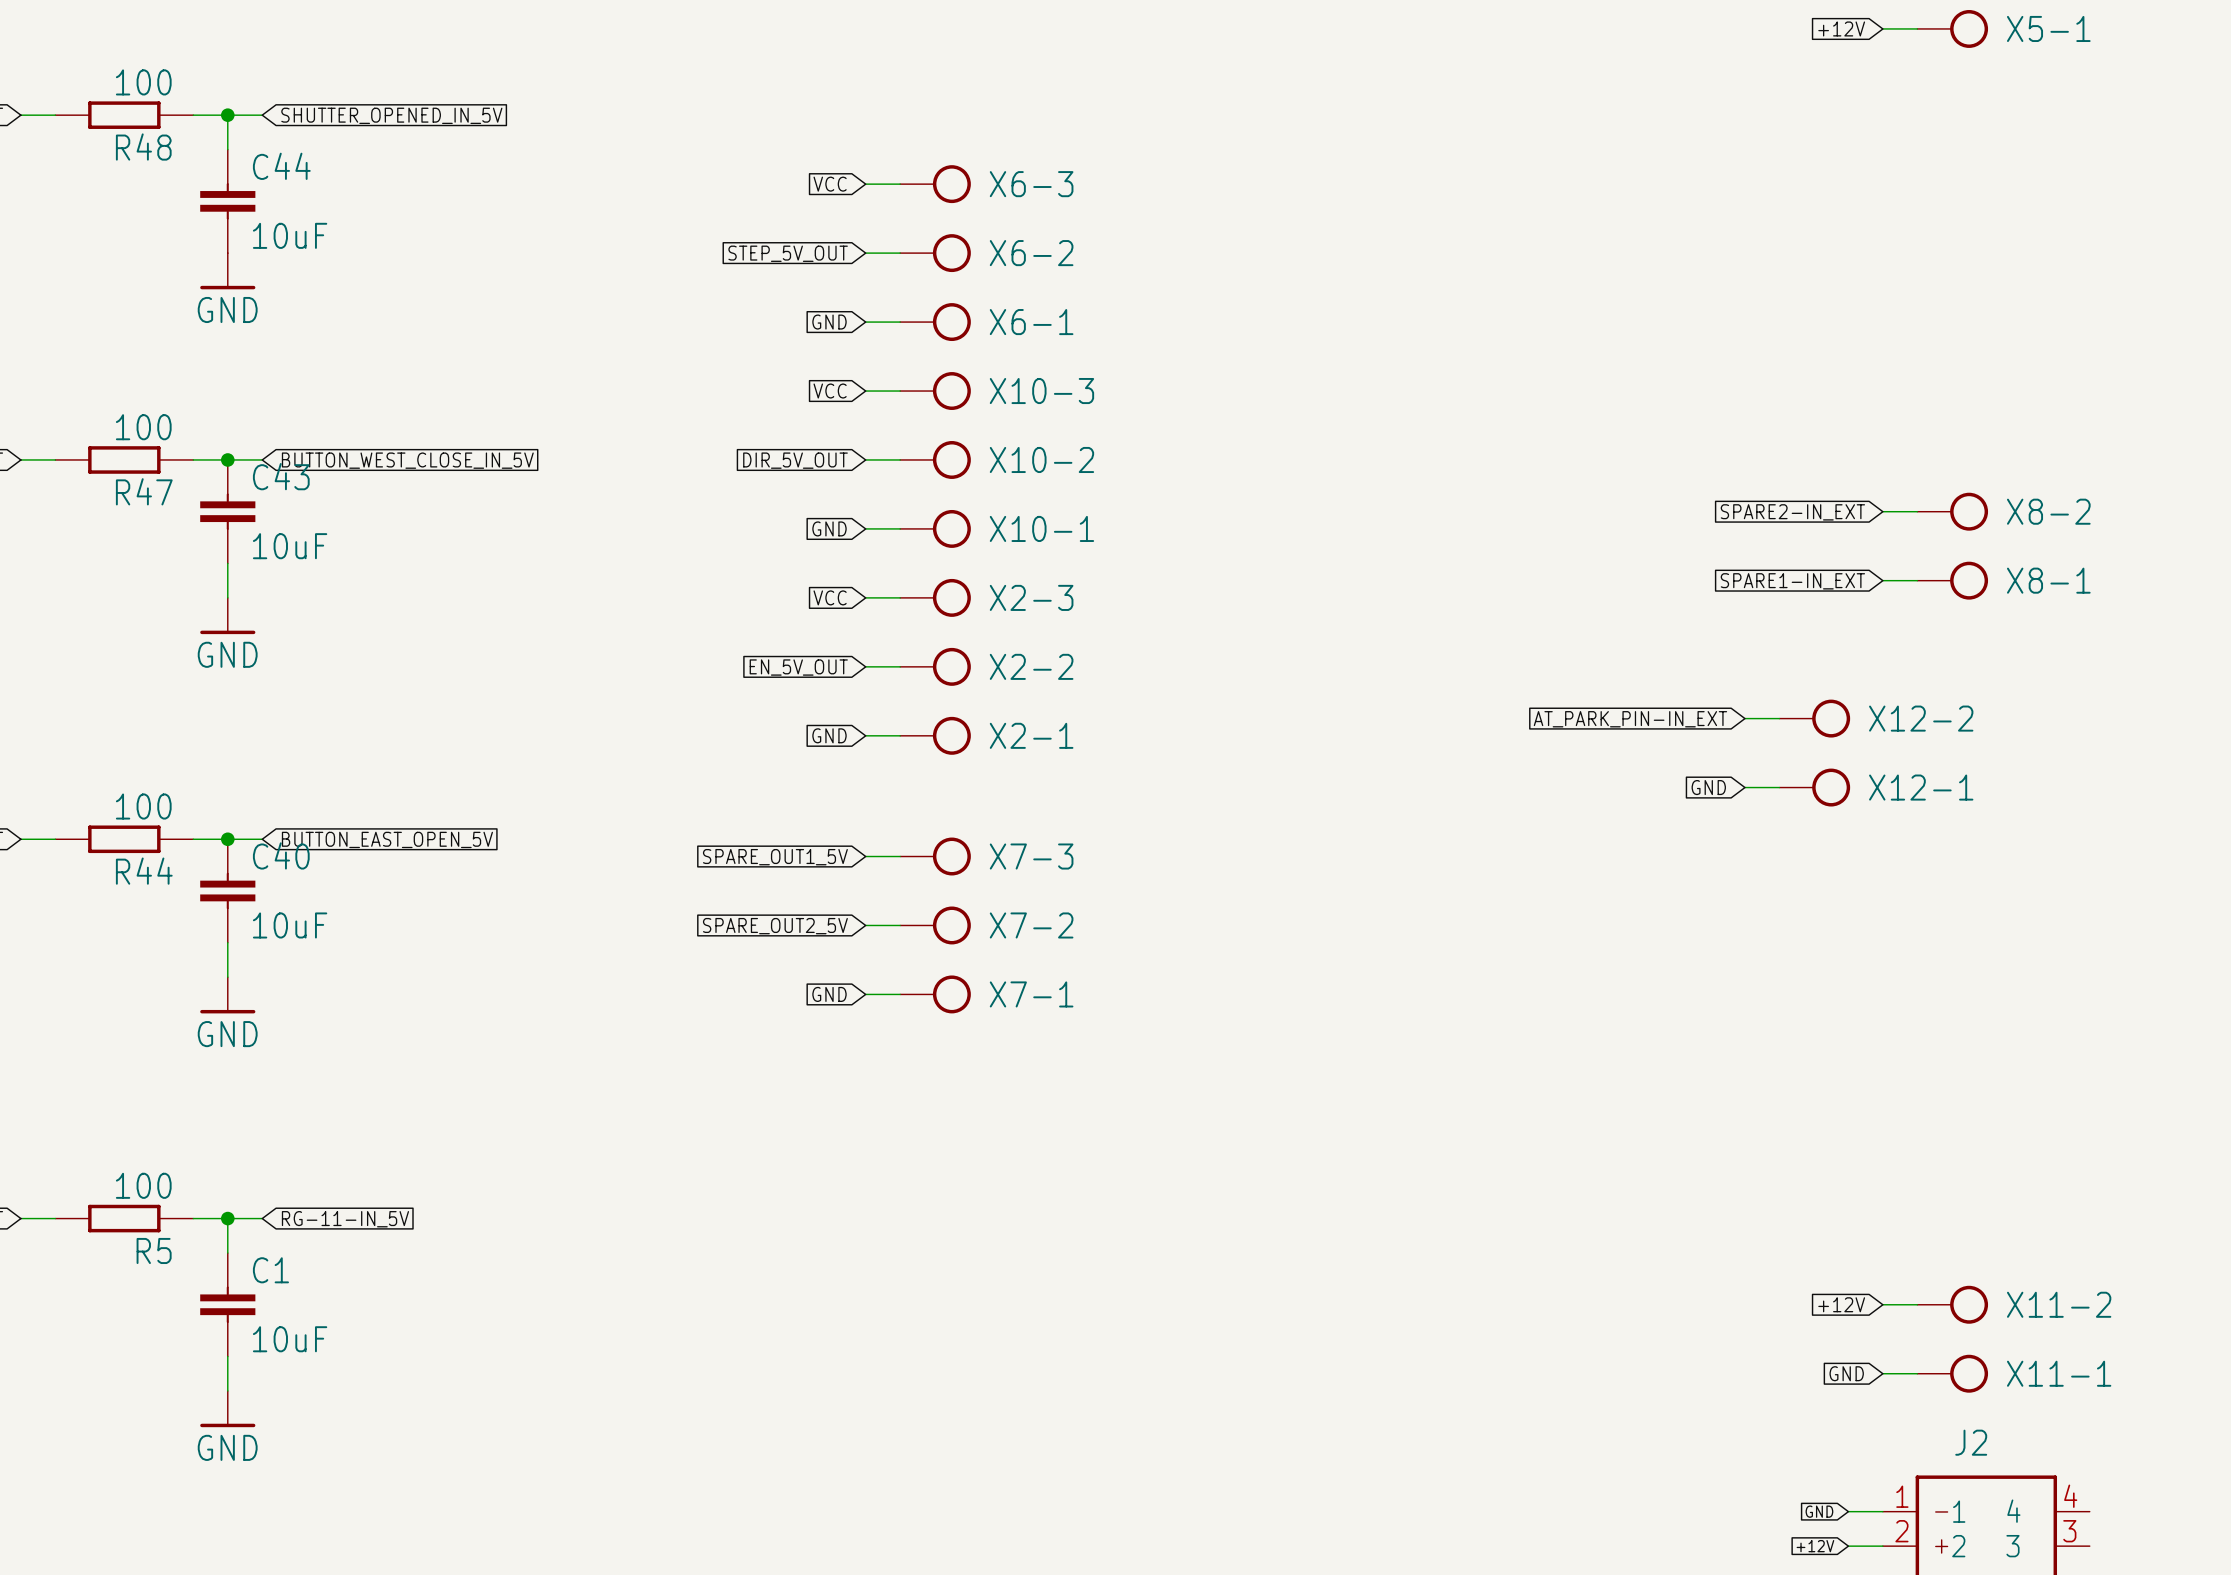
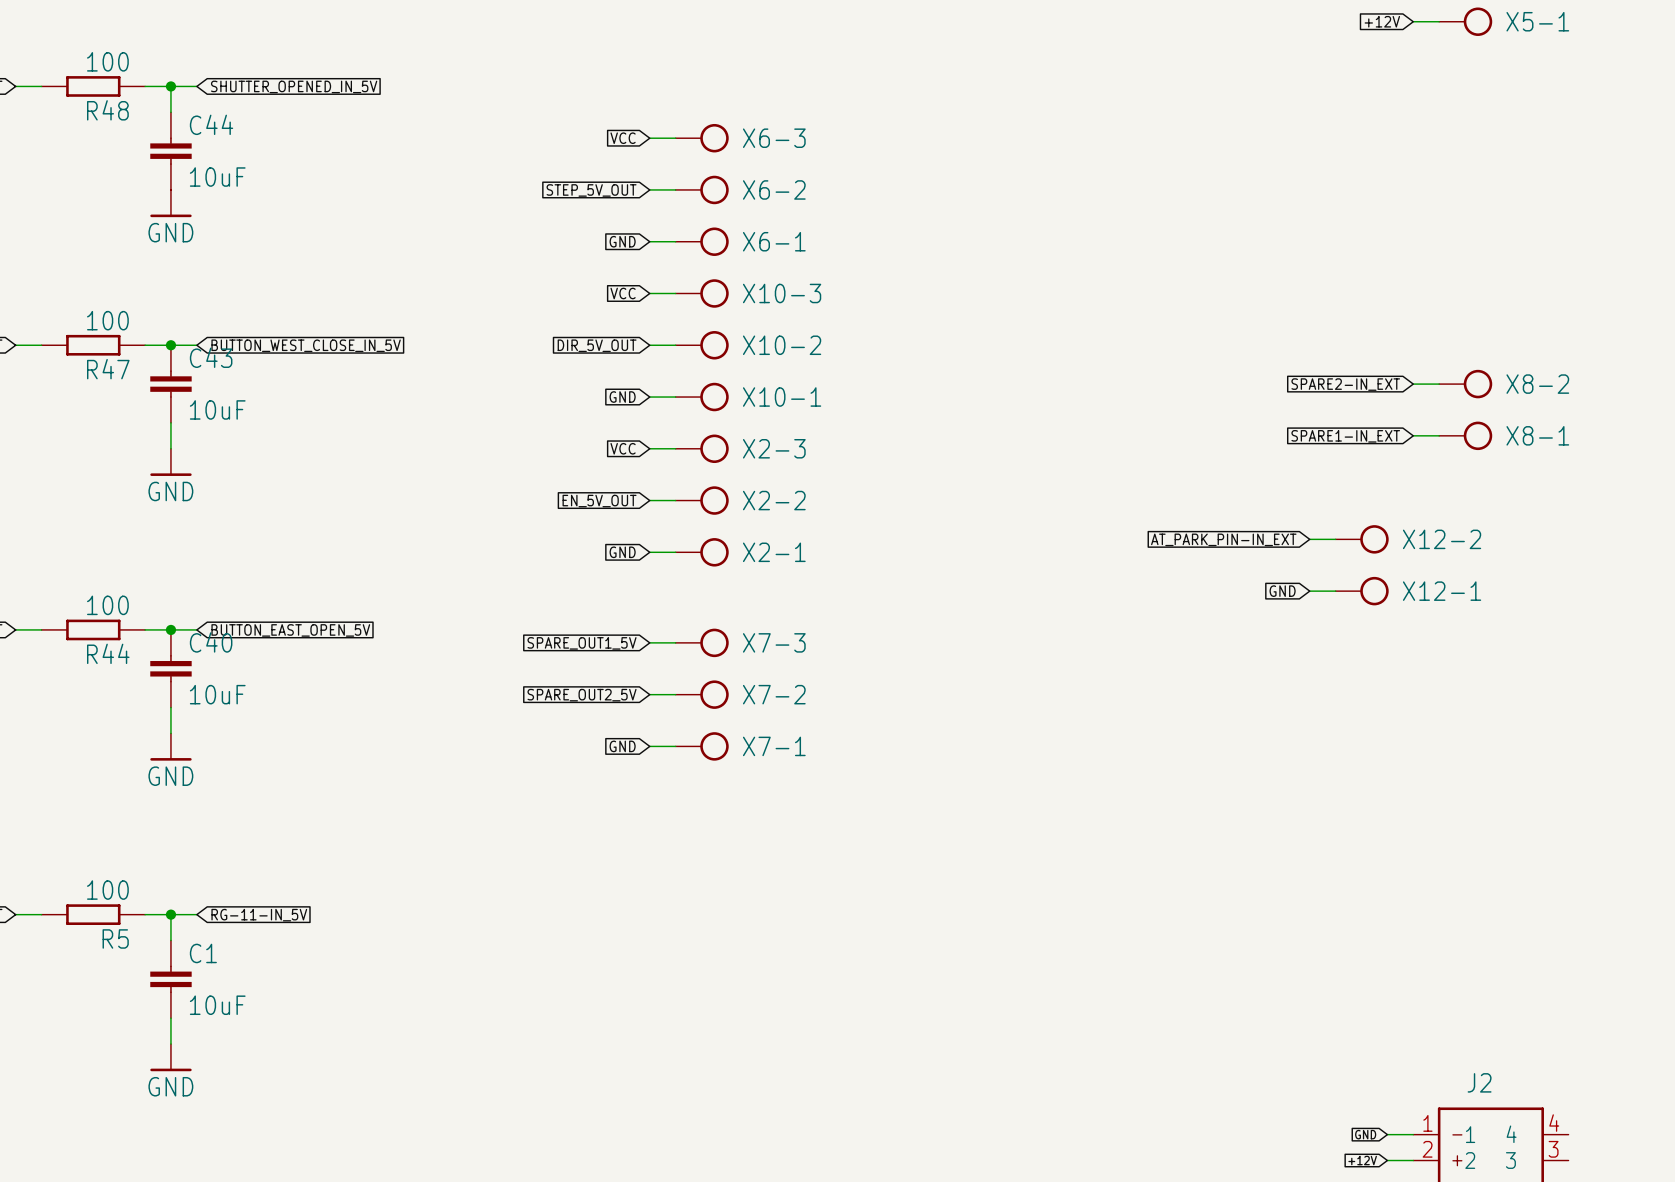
global label: +12V (1841, 1304) -> none
wire: (1882, 1304) (1917, 1304) -> none
X11-2: (1952, 1304) -> none
global label: GND (1846, 1373) -> none
wire: (1882, 1373) (1917, 1373) -> none
X11-1: (1952, 1373) -> none

